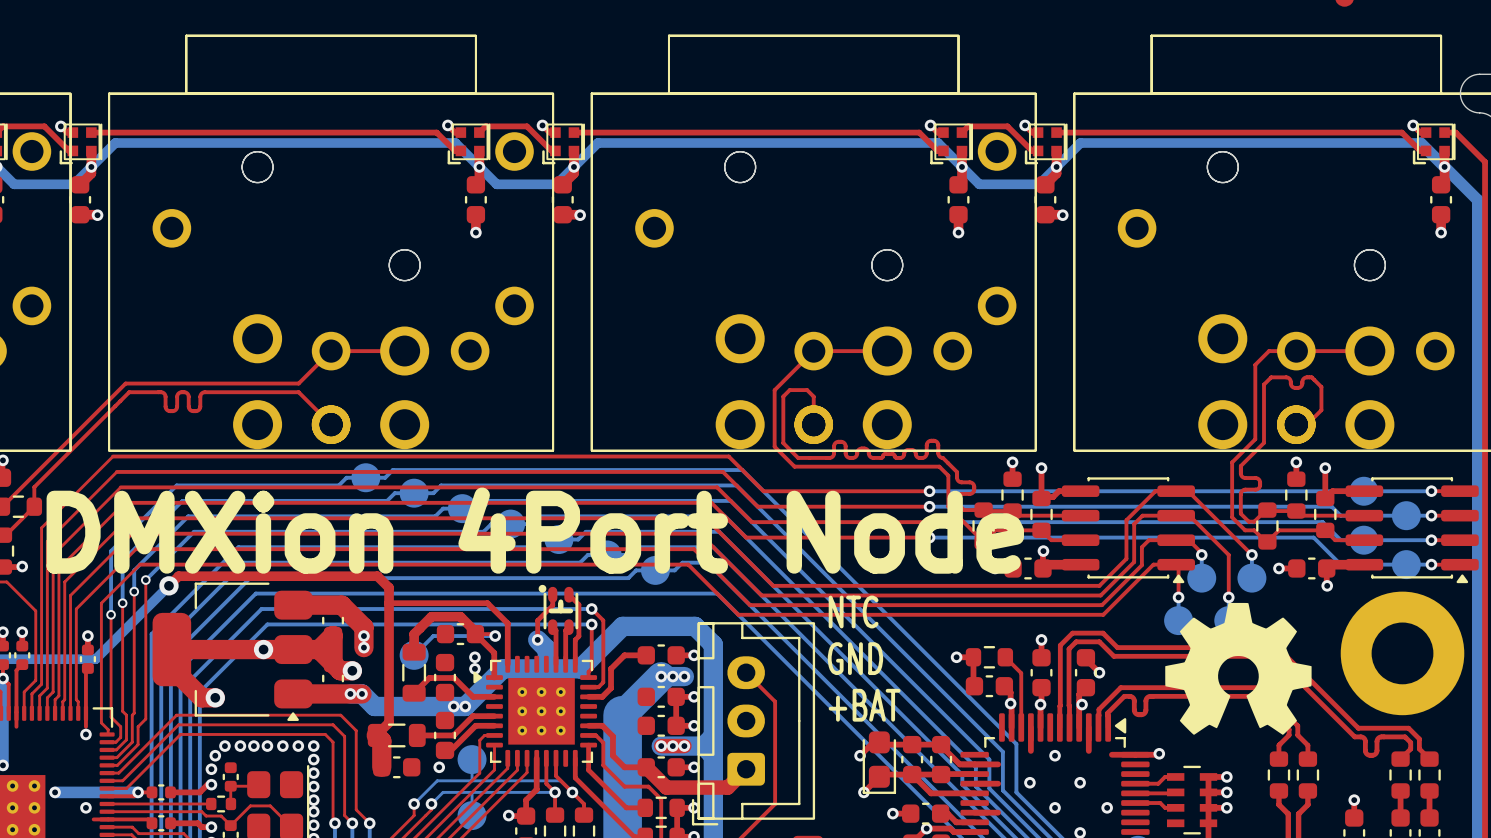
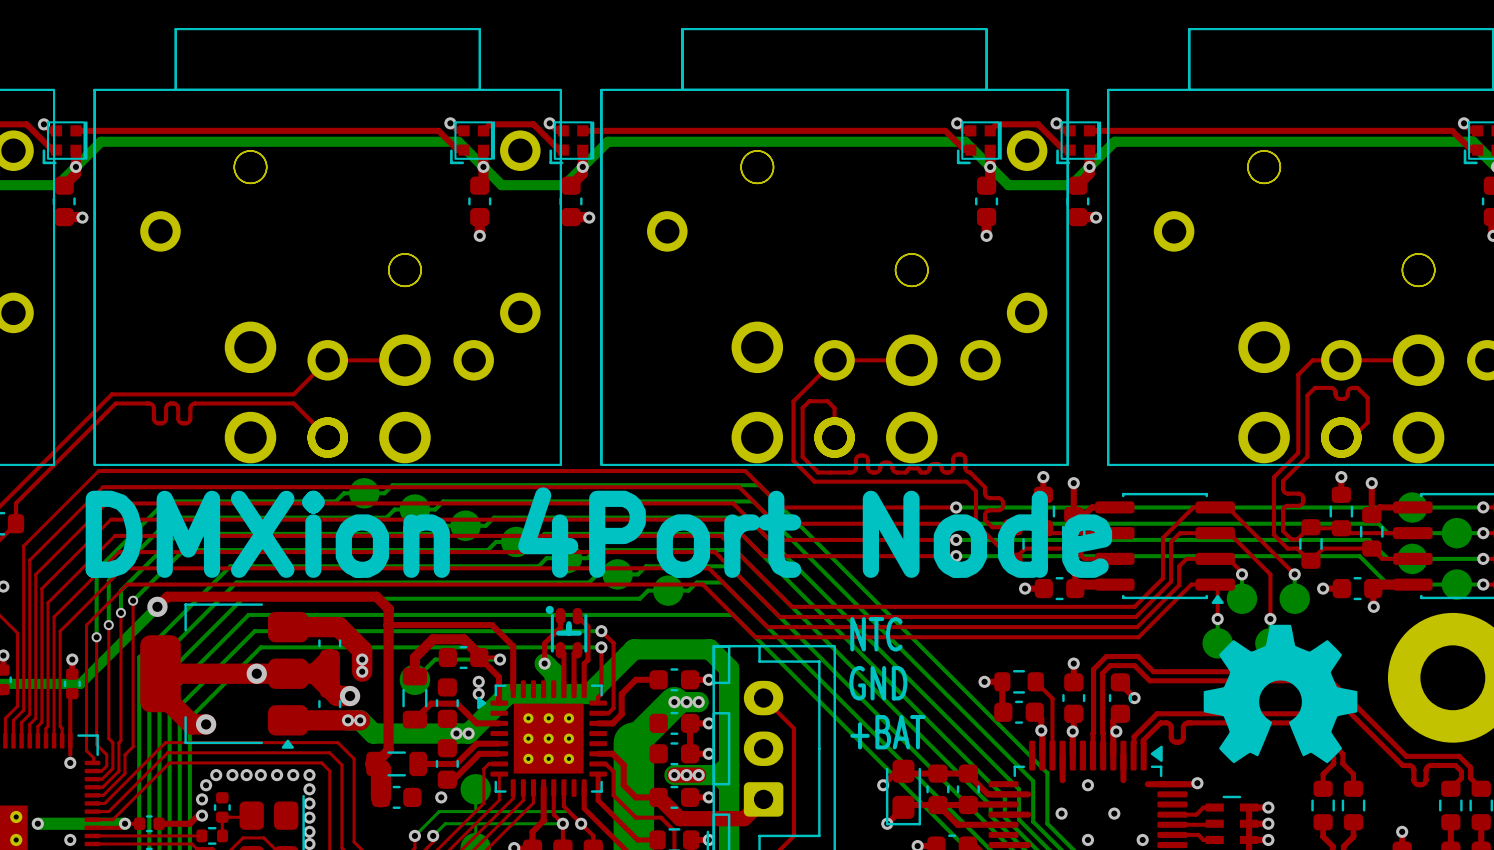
text position: DMXion 4Port Node (535, 530) -> DMXion 4Port Node (598, 532)

